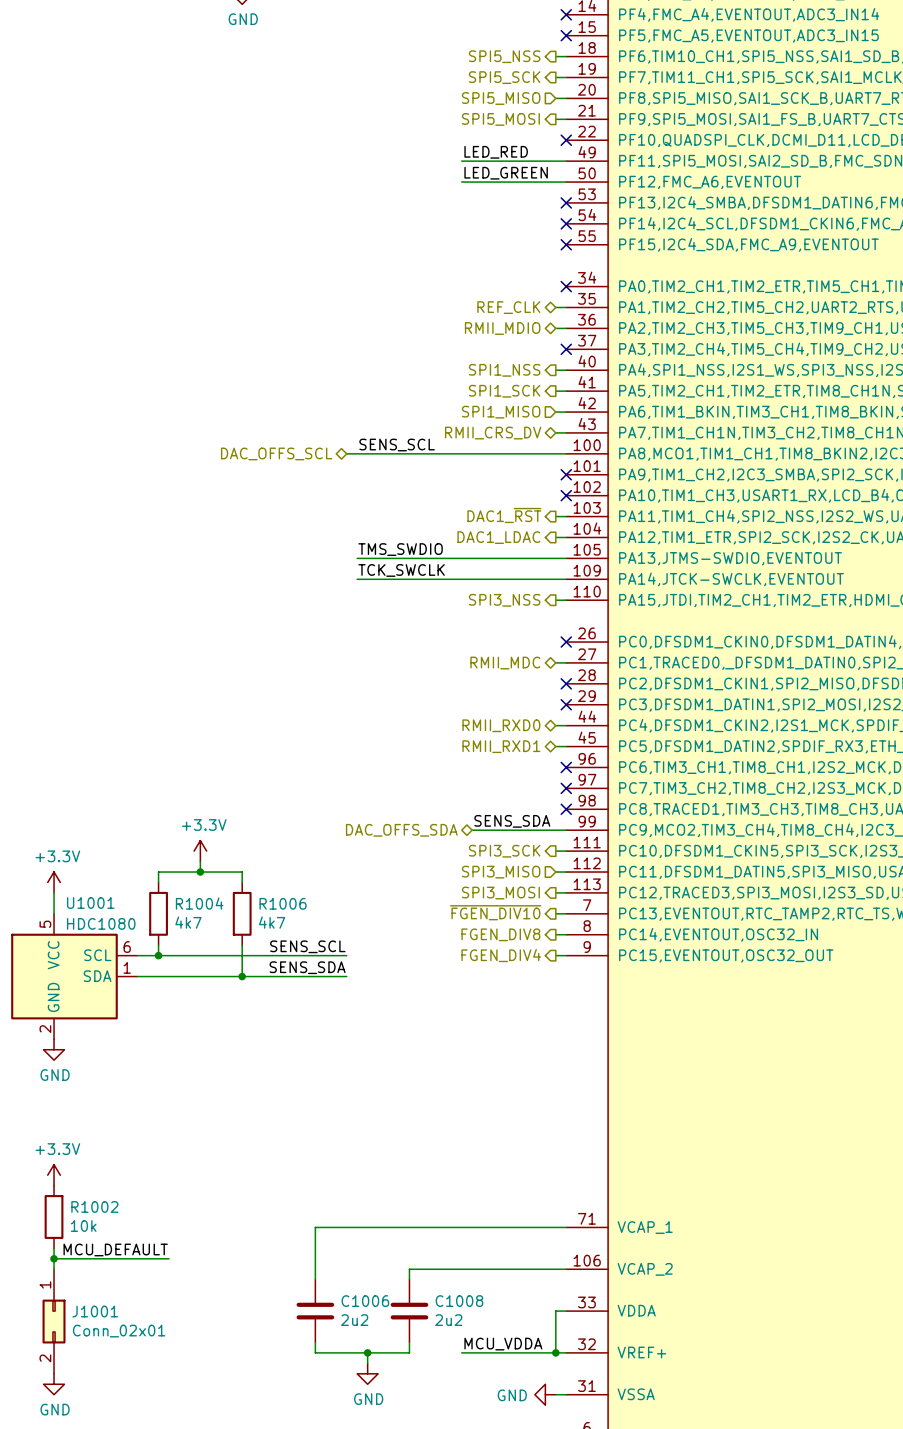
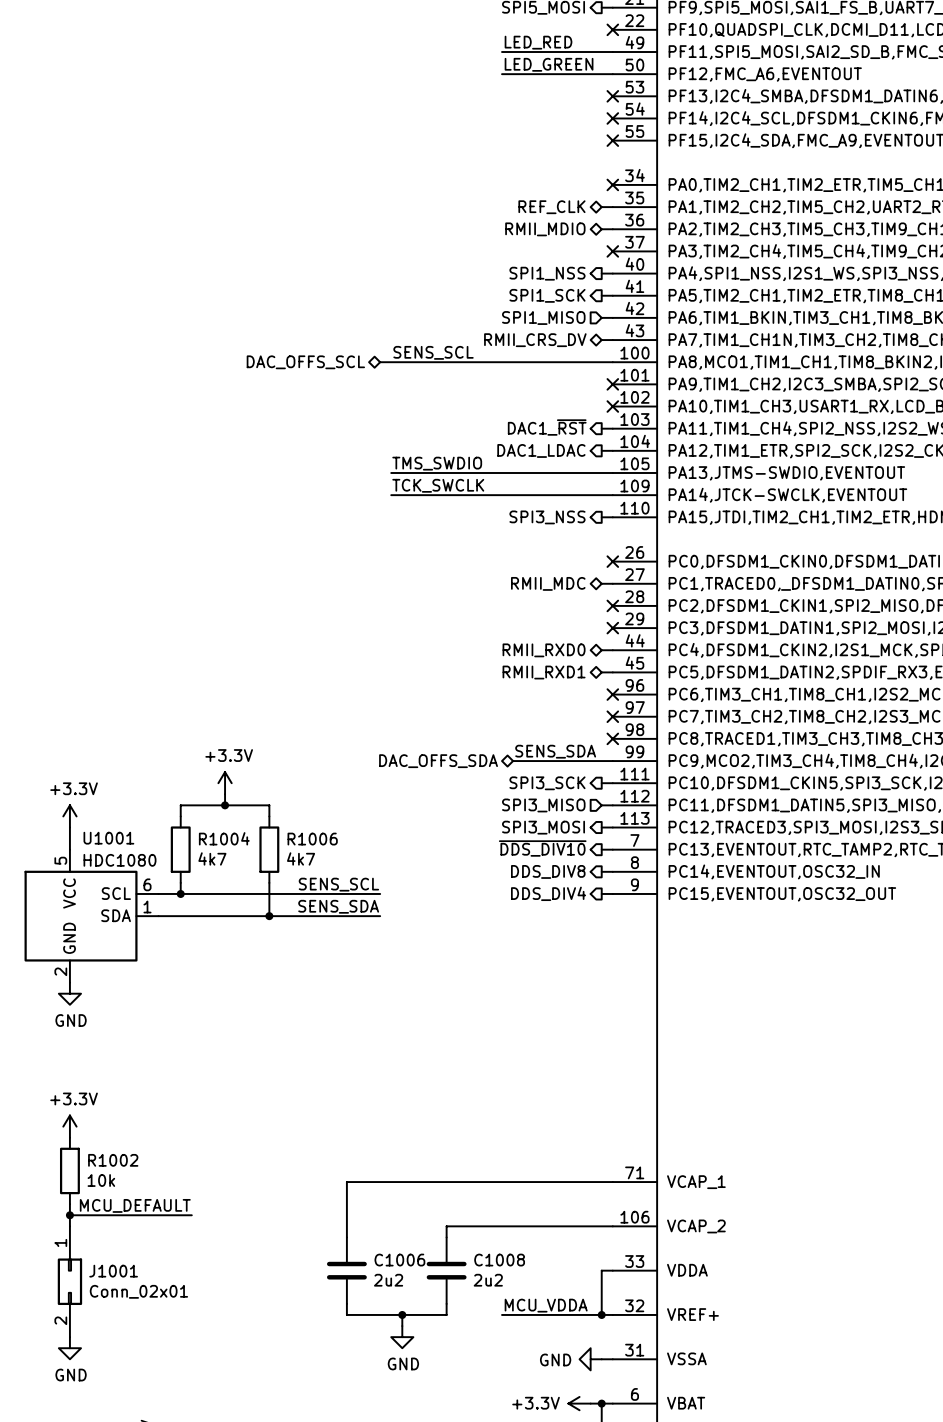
hierarchical label: ~{FGEN_DIV10} (495, 912) -> ~{DDS_DIV10} (542, 848)
hierarchical label: FGEN_DIV8 (500, 934) -> DDS_DIV8 (548, 871)
hierarchical label: FGEN_DIV4 (501, 955) -> DDS_DIV4 (548, 893)

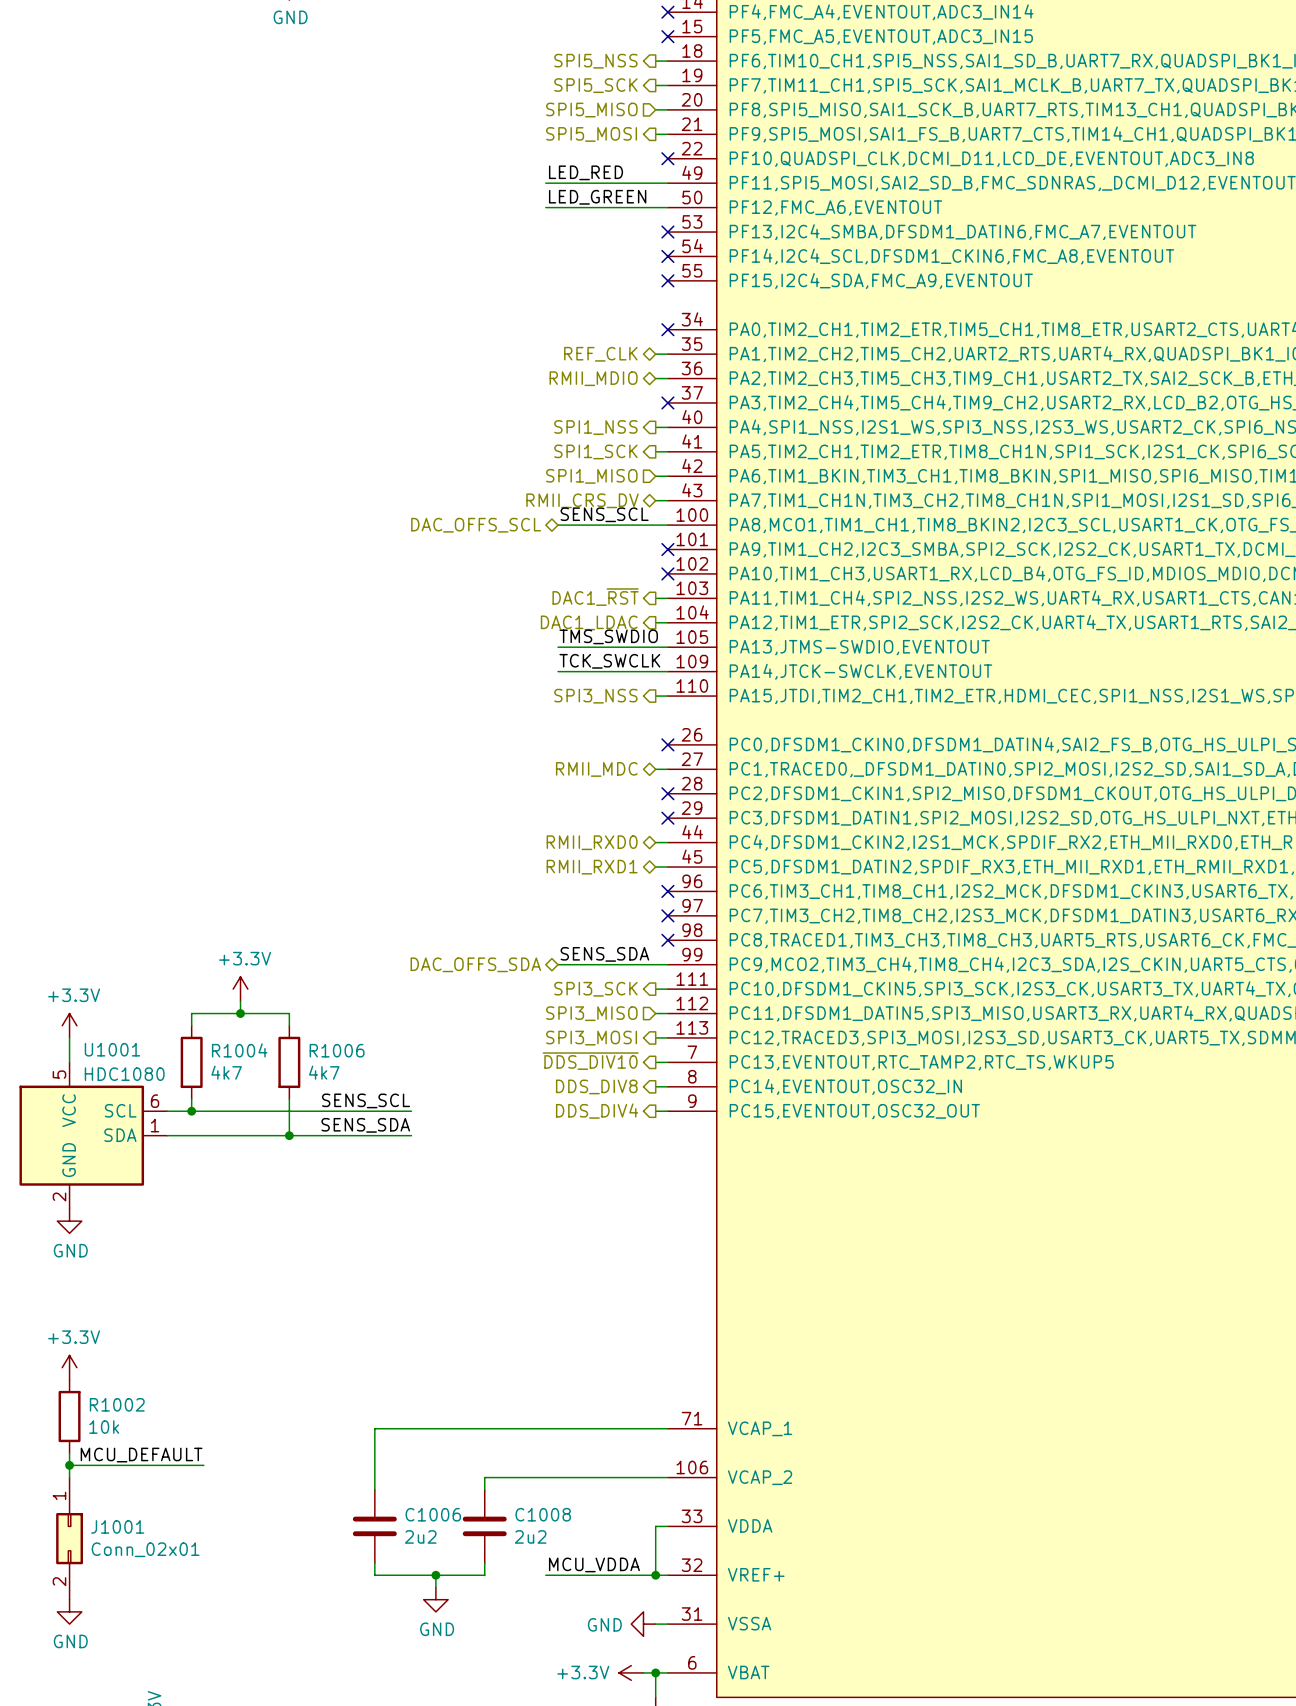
label position: SENS_SCL (433, 352) -> SENS_SCL (604, 514)
hierarchical label position: DAC_OFFS_SCL (305, 362) -> DAC_OFFS_SCL (476, 525)
wire: (380, 362) (513, 362) -> none
label position: TMS_SWDIO (437, 463) -> TMS_SWDIO (608, 636)
wire: (391, 472) (513, 472) -> none
label position: TCK_SWCLK (438, 485) -> TCK_SWCLK (609, 661)
wire: (391, 495) (513, 495) -> none

